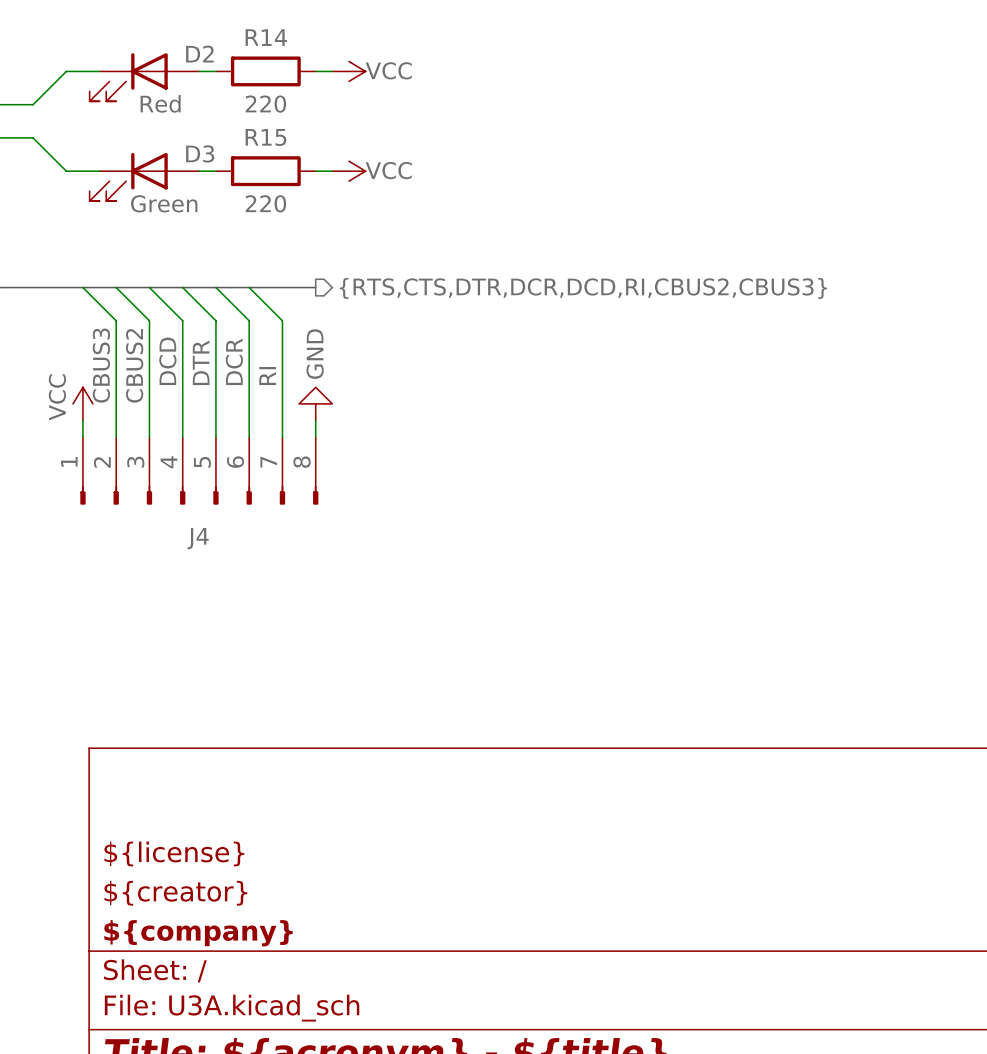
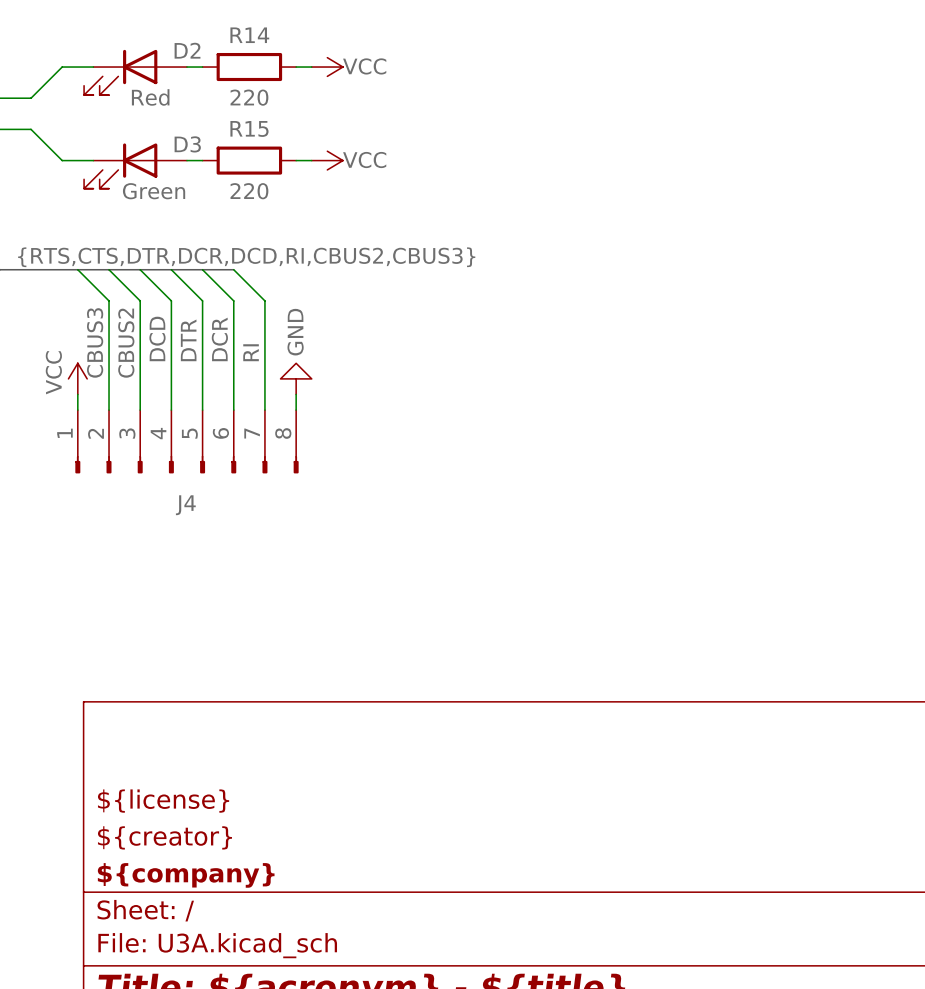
label: none -> {RTS,CTS,DTR,DCR,DCD,RI,CBUS2,CBUS3} (246, 257)
bus: (249, 287) (315, 287) -> none
hierarchical label: {RTS,CTS,DTR,DCR,DCD,RI,CBUS2,CBUS3} (583, 288) -> none

